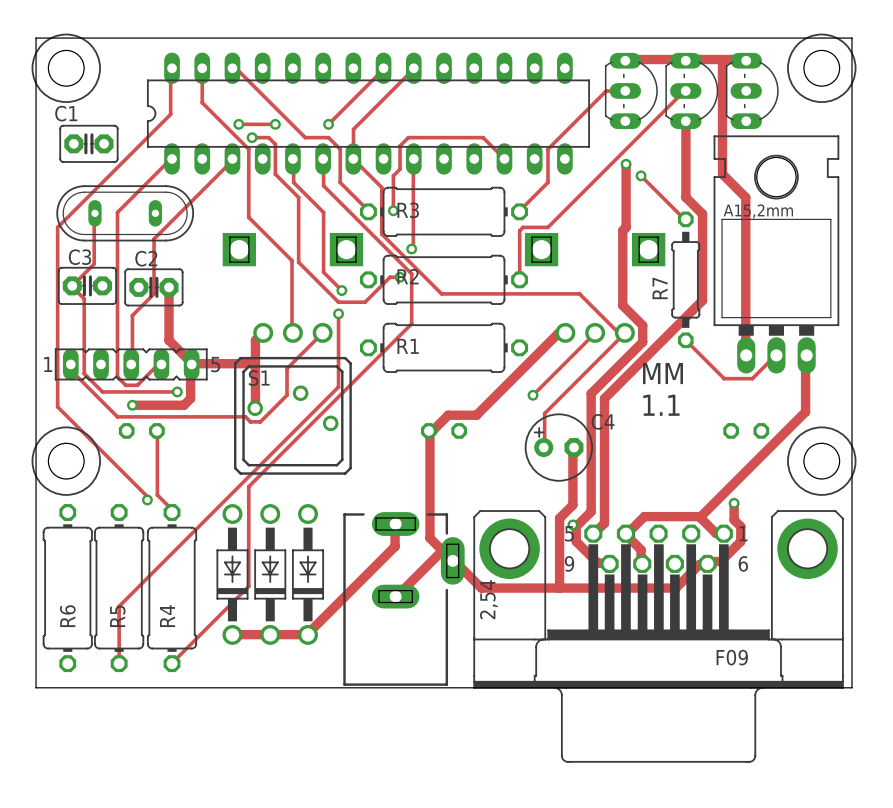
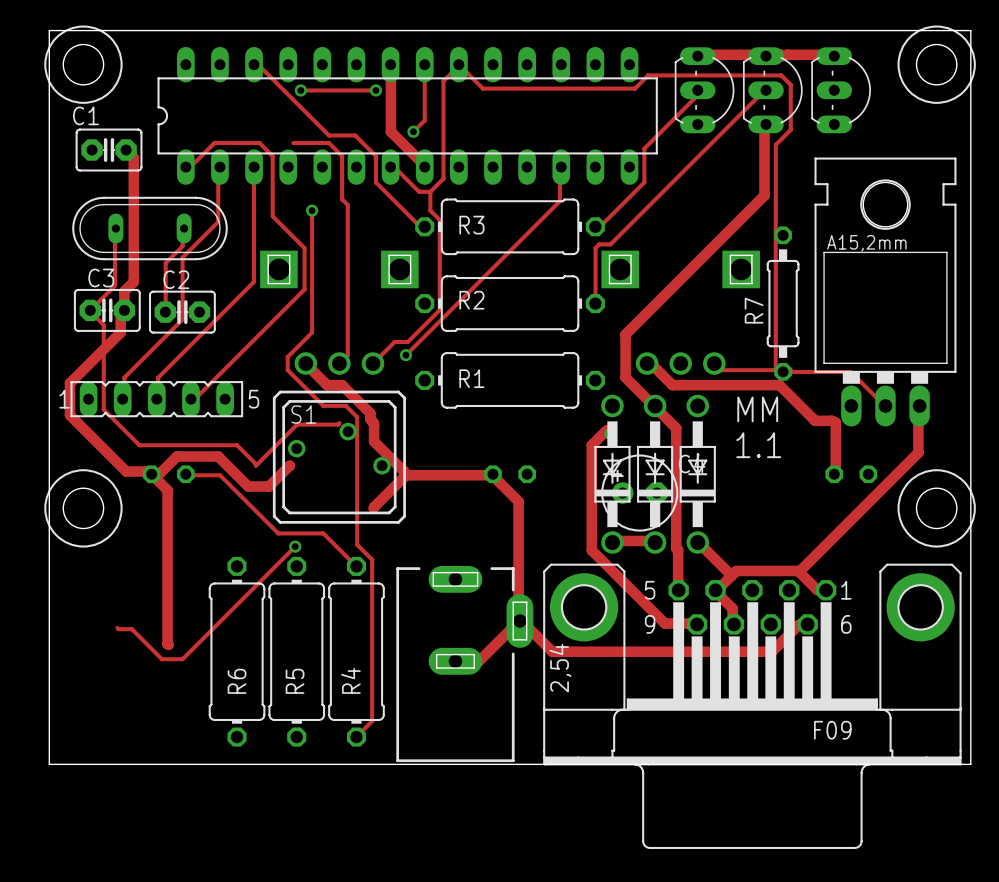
track: (722, 59) (722, 174) (745, 197) (746, 355) -> none
track: (172, 68) (170, 114) (57, 227) (57, 406) (147, 496) (147, 499) -> none
track: (202, 68) (202, 102) (248, 149) (248, 217) -> (185, 167) (191, 165) (214, 143) (259, 143) (272, 156) (272, 216) (289, 233)
track: (232, 68) (237, 69) (305, 137) (328, 137) (340, 149) (340, 182) (368, 210) -> (254, 64) (259, 66) (329, 135) (355, 135) (375, 156) (375, 182) (419, 225) (424, 225)
track: none -> (390, 64) (390, 131) (424, 167)
track: none -> (424, 64) (424, 120) (413, 131)
track: (383, 68) (328, 124) -> none
track: (413, 68) (353, 129) (353, 158) (381, 187) (381, 205) -> (430, 191) (430, 210) (439, 219)
track: (625, 90) (606, 91) (547, 149) (547, 182) (519, 210) -> (697, 90) (696, 96) (644, 148) (644, 182) (601, 225) (595, 225)
part position: (631, 90) -> (704, 90)
track: (685, 90) (547, 227) (533, 227) -> (766, 90) (610, 244)
part position: (691, 90) -> (772, 90)
part position: (752, 90) -> (841, 90)
track: none -> (300, 90) (375, 90)
via: none -> (300, 90)
via: none -> (375, 90)
part position: (368, 113) -> (407, 115)
track: (685, 121) (685, 197) (702, 214) (702, 300) (604, 398) (604, 523) (593, 533) -> none
track: (238, 124) (275, 124) -> none
via: (238, 124) -> none
via: (275, 124) -> none
via: (328, 124) -> none
via: none -> (413, 131)
via: (252, 137) -> none
track: (268, 137) (275, 144) (275, 174) (298, 197) (298, 262) (338, 302) (365, 302) -> (312, 143) (329, 143) (342, 156) (342, 199) (347, 204) (347, 355) (339, 363)
track: none -> (126, 150) (133, 158) (133, 281) (124, 291) (124, 310) (120, 313) (120, 332) (69, 383) (69, 415) (126, 471) (146, 471) (151, 474)
track: (172, 158) (117, 212) (117, 376) (125, 385) (137, 385) (157, 365) (161, 364) -> (304, 248) (304, 289) (195, 398) (190, 399)
track: none -> (254, 167) (253, 281) (158, 377)
track: (232, 158) (185, 207) -> (219, 167) (218, 167) (218, 221)
track: (292, 158) (293, 182) (323, 212) (323, 272) (341, 290) -> none
track: (323, 158) (323, 185) (411, 273) (411, 323) (248, 486) (248, 586) (172, 663) -> none
track: none -> (390, 167) (394, 167) (419, 191) (430, 191)
track: (413, 158) (413, 247) (411, 249) -> none
track: none -> (561, 167) (559, 201) (405, 355)
track: (504, 158) (483, 137) (408, 137) (400, 145) (400, 169) (393, 175) (393, 210) -> none
track: (626, 164) (626, 227) -> (766, 124) (764, 195) (715, 244)
via: (626, 164) -> none
track: (641, 175) (685, 219) -> none
via: (641, 175) -> none
track: none -> (430, 191) (443, 178) (443, 81) (458, 64) (482, 88) (634, 88) (648, 75) (781, 75) (790, 84) (790, 129) (775, 144) (775, 370)
track: none -> (312, 210) (312, 332) (287, 357) (287, 370) (323, 405) (345, 405) (357, 417) (357, 544) (372, 559) (372, 721) (356, 737)
via: none -> (312, 210)
via: (393, 210) -> none
track: none -> (184, 228) (182, 246) (165, 263) (165, 312)
track: (262, 230) (292, 260) (292, 332) -> none
track: (622, 230) (622, 305) (642, 325) (642, 342) (591, 393) -> (711, 248) (625, 334) (625, 377) (676, 428) (676, 432)
track: (381, 234) (441, 293) (579, 293) (621, 335) (624, 332) (544, 413) (543, 447) -> none
via: (411, 249) -> none
part position: (776, 254) -> (885, 291)
track: (400, 277) (390, 277) (381, 285) -> (439, 251) (439, 310)
via: (400, 277) -> none
track: (169, 287) (169, 340) (191, 364) -> none
via: (341, 290) -> none
track: (338, 313) (338, 386) (119, 606) (119, 663) -> none
via position: (338, 313) -> (405, 355)
track: (132, 315) (132, 345) -> (158, 343) (124, 377) (124, 398) (122, 399)
track: (263, 332) (255, 340) (255, 408) -> (305, 363) (327, 385) (342, 385) (370, 413) (370, 418) (374, 424) (374, 441) (405, 475)
track: (322, 332) (287, 368) (287, 395) (260, 421) (250, 421) (245, 416) (117, 416) (70, 370) (70, 365) -> (373, 363) (394, 341) (407, 341) (420, 328)
track: (565, 332) (557, 333) (476, 415) (448, 415) (433, 430) (428, 430) (429, 538) (452, 560) -> (647, 363) (651, 364) (672, 385) (779, 385) (815, 420) (832, 420) (835, 422) (835, 473) (834, 474)
track: (595, 332) (533, 395) -> none
track: none -> (714, 363) (721, 370) (850, 372) (885, 405)
track: (685, 340) (724, 378) (752, 378) (776, 355) -> none
track: (255, 363) (191, 364) -> none
track: (191, 364) (190, 398) (183, 405) -> (339, 423) (297, 424) (255, 465) (237, 445) (216, 445)
track: (102, 391) (177, 391) -> (124, 430) (139, 445) (158, 445)
via: (177, 391) -> none
track width: thick (132, 405) (183, 405) -> thin (158, 445) (216, 445)
via: (132, 405) -> none
track: none -> (289, 465) (268, 486) (248, 486) (218, 456) (176, 456) (158, 475) (151, 474)
track: none -> (151, 474) (167, 490) (168, 644)
part: none -> (612, 474)
part: none -> (655, 474)
part: none -> (697, 474)
track: (157, 431) (157, 495) (170, 508) (172, 512) -> (186, 475) (220, 475) (278, 533) (323, 533) (356, 566)
track: none -> (405, 475) (373, 508)
track: (573, 447) (572, 504) (559, 518) (559, 588) -> none
track: none -> (612, 542) (612, 540) (655, 542)
track: none -> (697, 542) (731, 575)
track: none -> (295, 546) (182, 659) (161, 659) (131, 629) (117, 627)
via: none -> (295, 546)
track: (591, 496) (591, 511) (576, 526) -> (676, 548) (678, 550) (678, 590)
via: (147, 499) -> none
track: (734, 503) (734, 519) (740, 526) (740, 541) (720, 561) (710, 561) (707, 563) -> none
via: (734, 503) -> none
track: (395, 524) (395, 546) (308, 634) (232, 634) -> none
via: (572, 524) -> none
track: (576, 526) (576, 541) (597, 563) -> (606, 430) (591, 445) (591, 550) (665, 623) (683, 623)
track: (442, 550) (396, 596) -> (405, 475) (492, 474) (518, 501) (519, 621) (479, 661) (456, 661)
part: (232, 574) -> none
part: (270, 574) -> none
part: (308, 574) -> none
R6 position: (67, 588) -> (237, 651)
R5 position: (119, 588) -> (296, 651)
R4 position: (172, 588) -> (356, 651)

